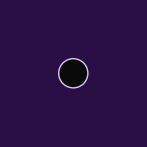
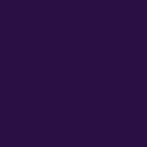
part: (73, 73) -> none

